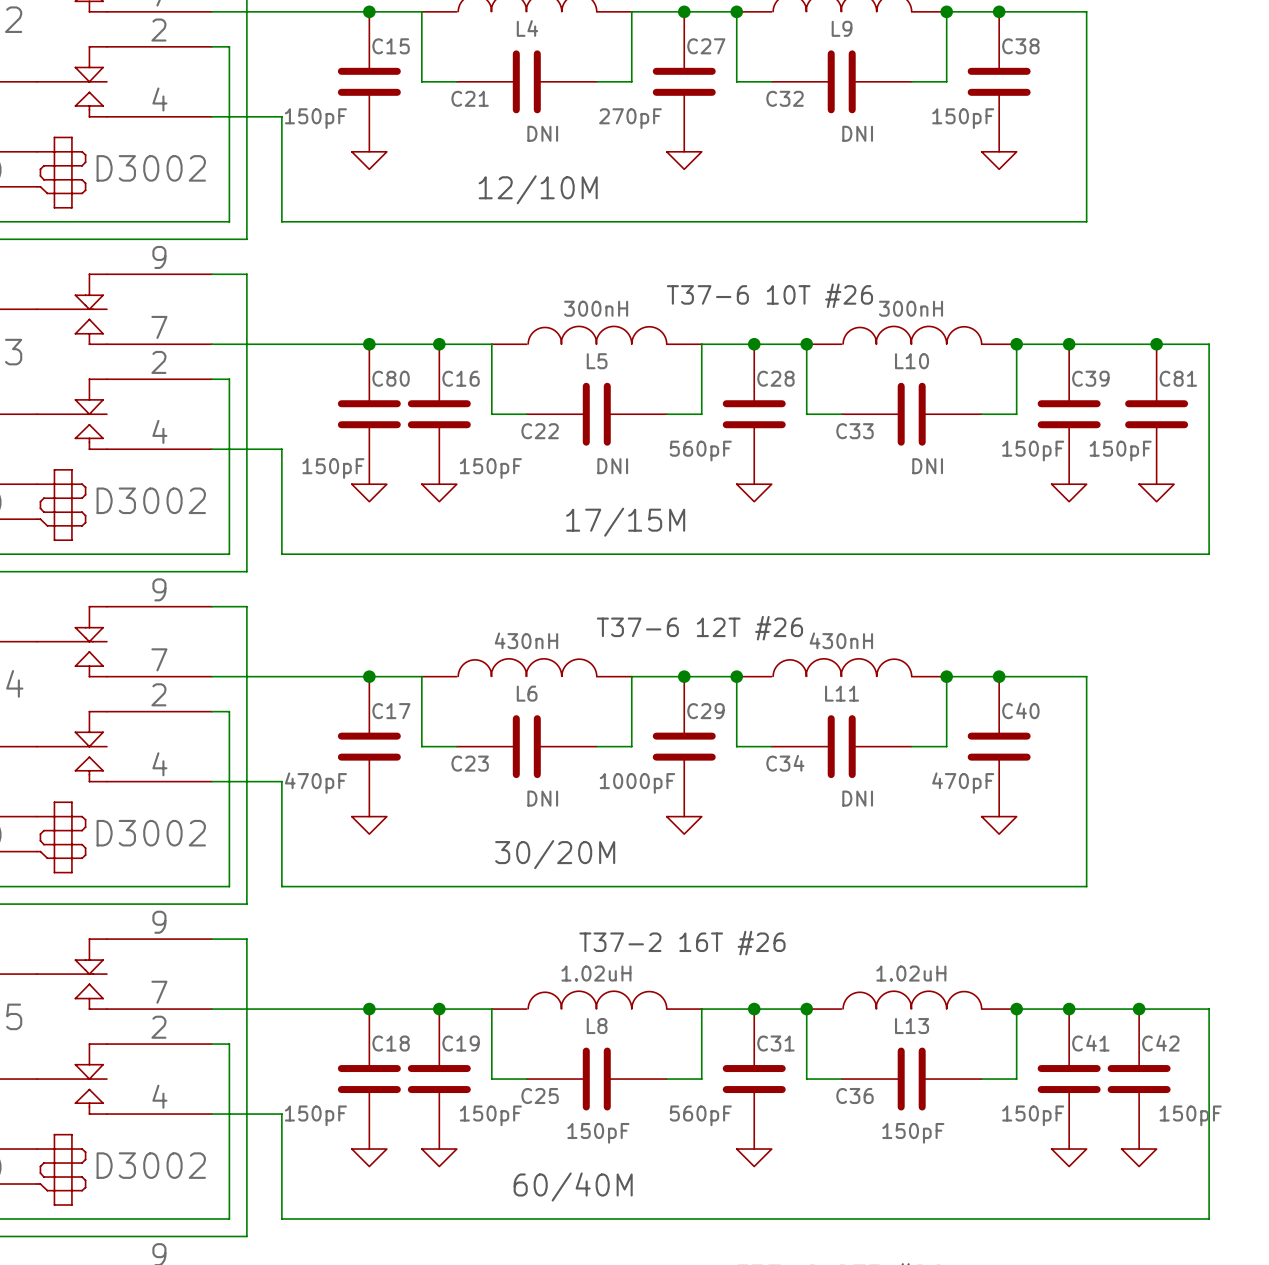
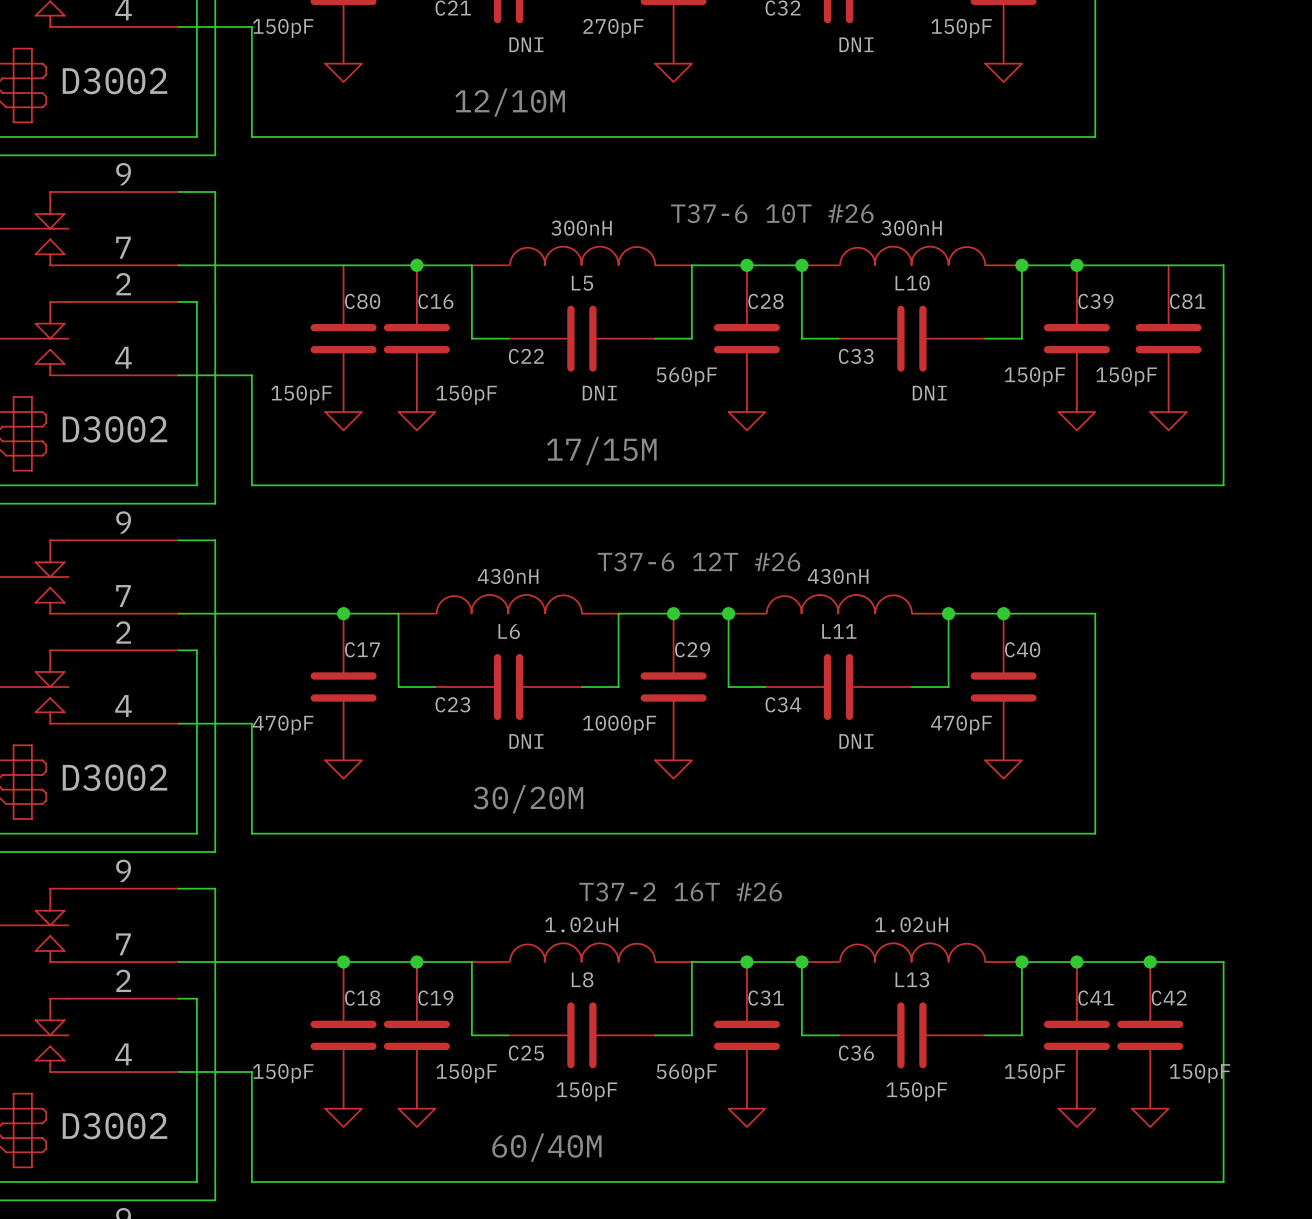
junction: (369, 344) -> none
junction: (1156, 344) -> none

